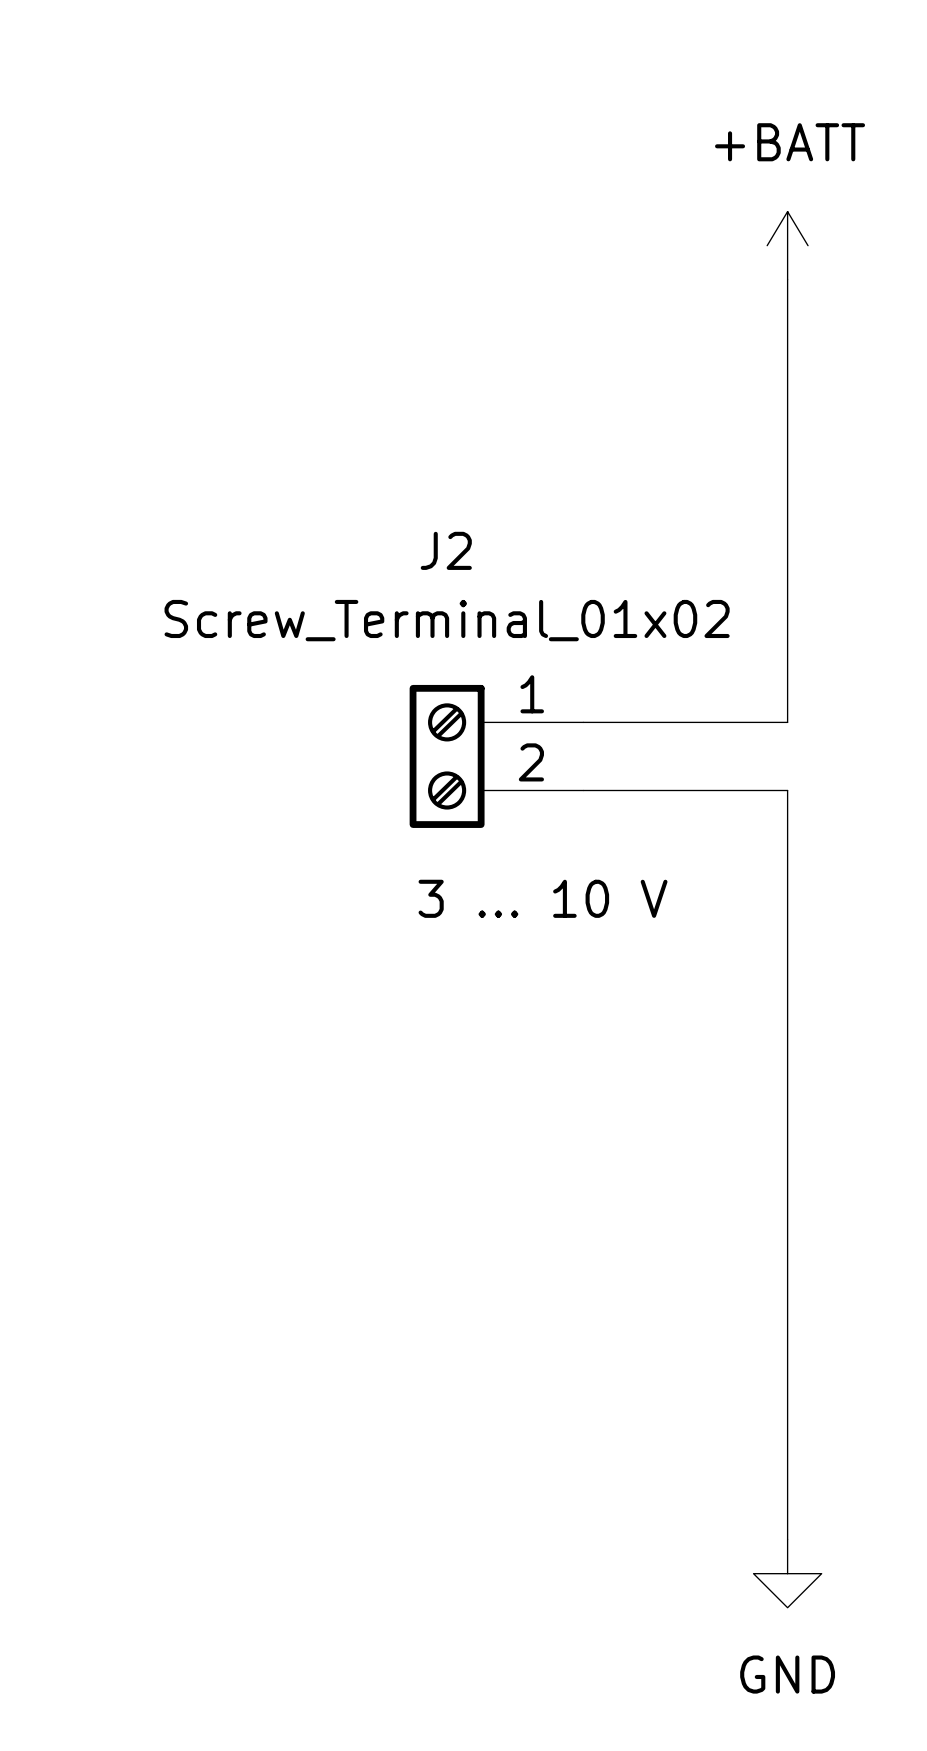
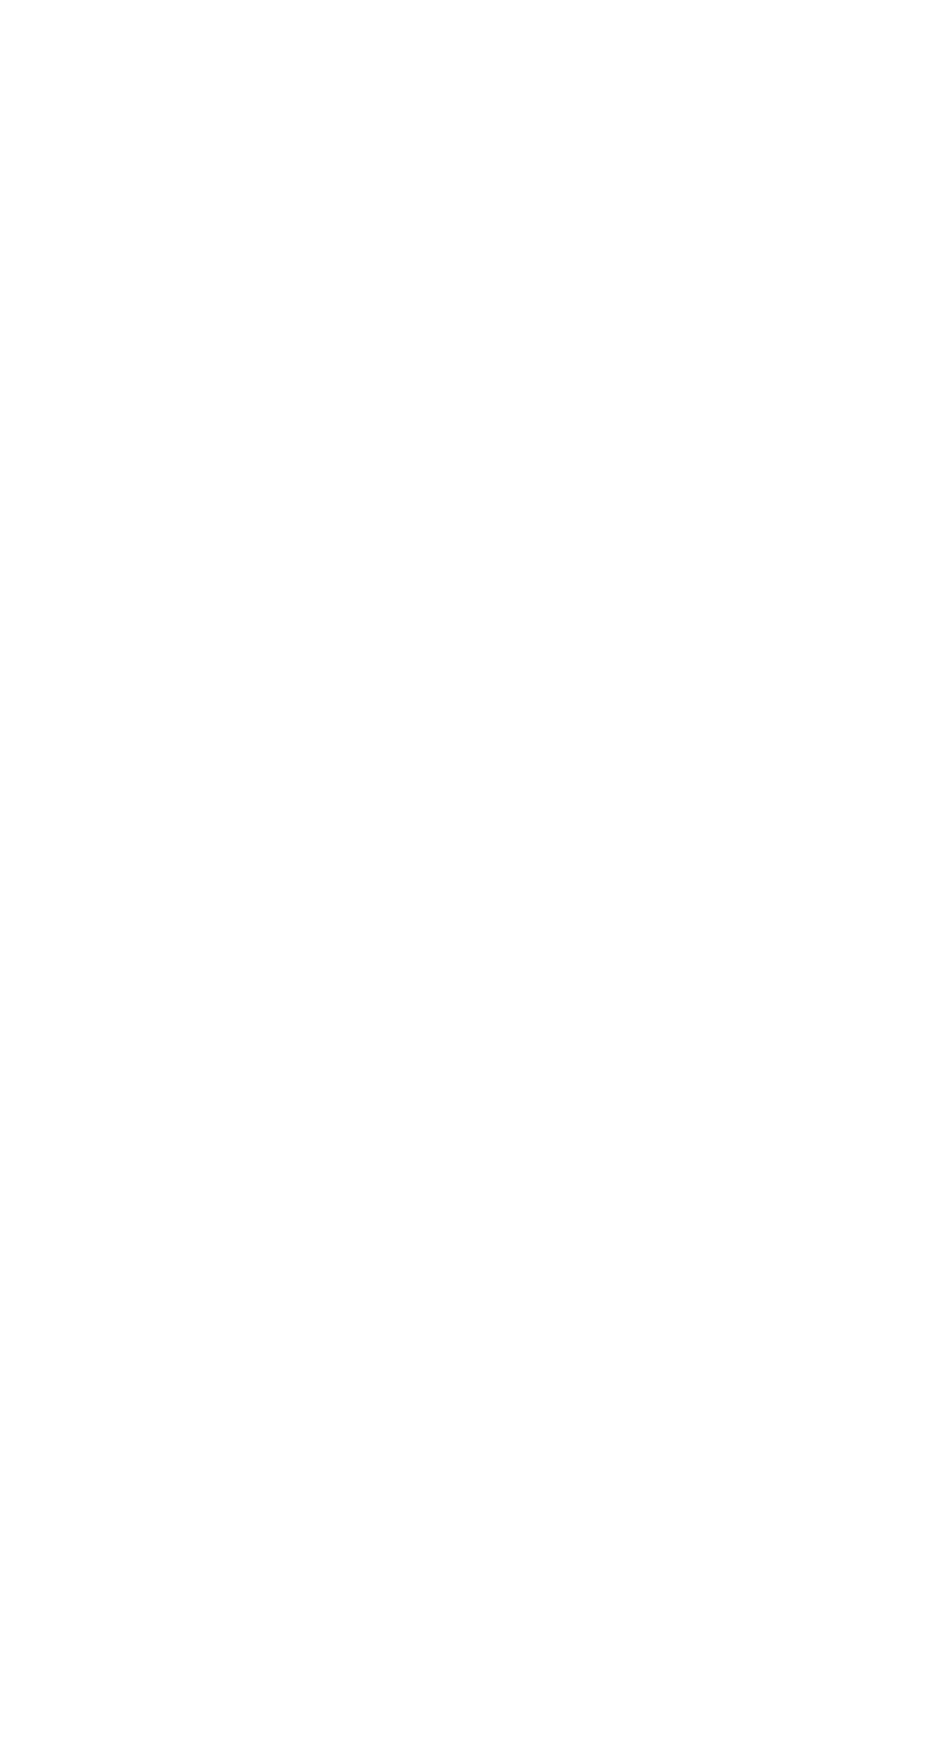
power symbol: +BATT (787, 245) -> none
wire: (787, 279) (787, 722) (583, 722) -> none
J2: Screw_Terminal_01x02 (496, 756) -> none
wire: (583, 790) (787, 790) (787, 1539) -> none
text: 3 ... 10 V (543, 898) -> none
power symbol: GND (787, 1573) -> none

